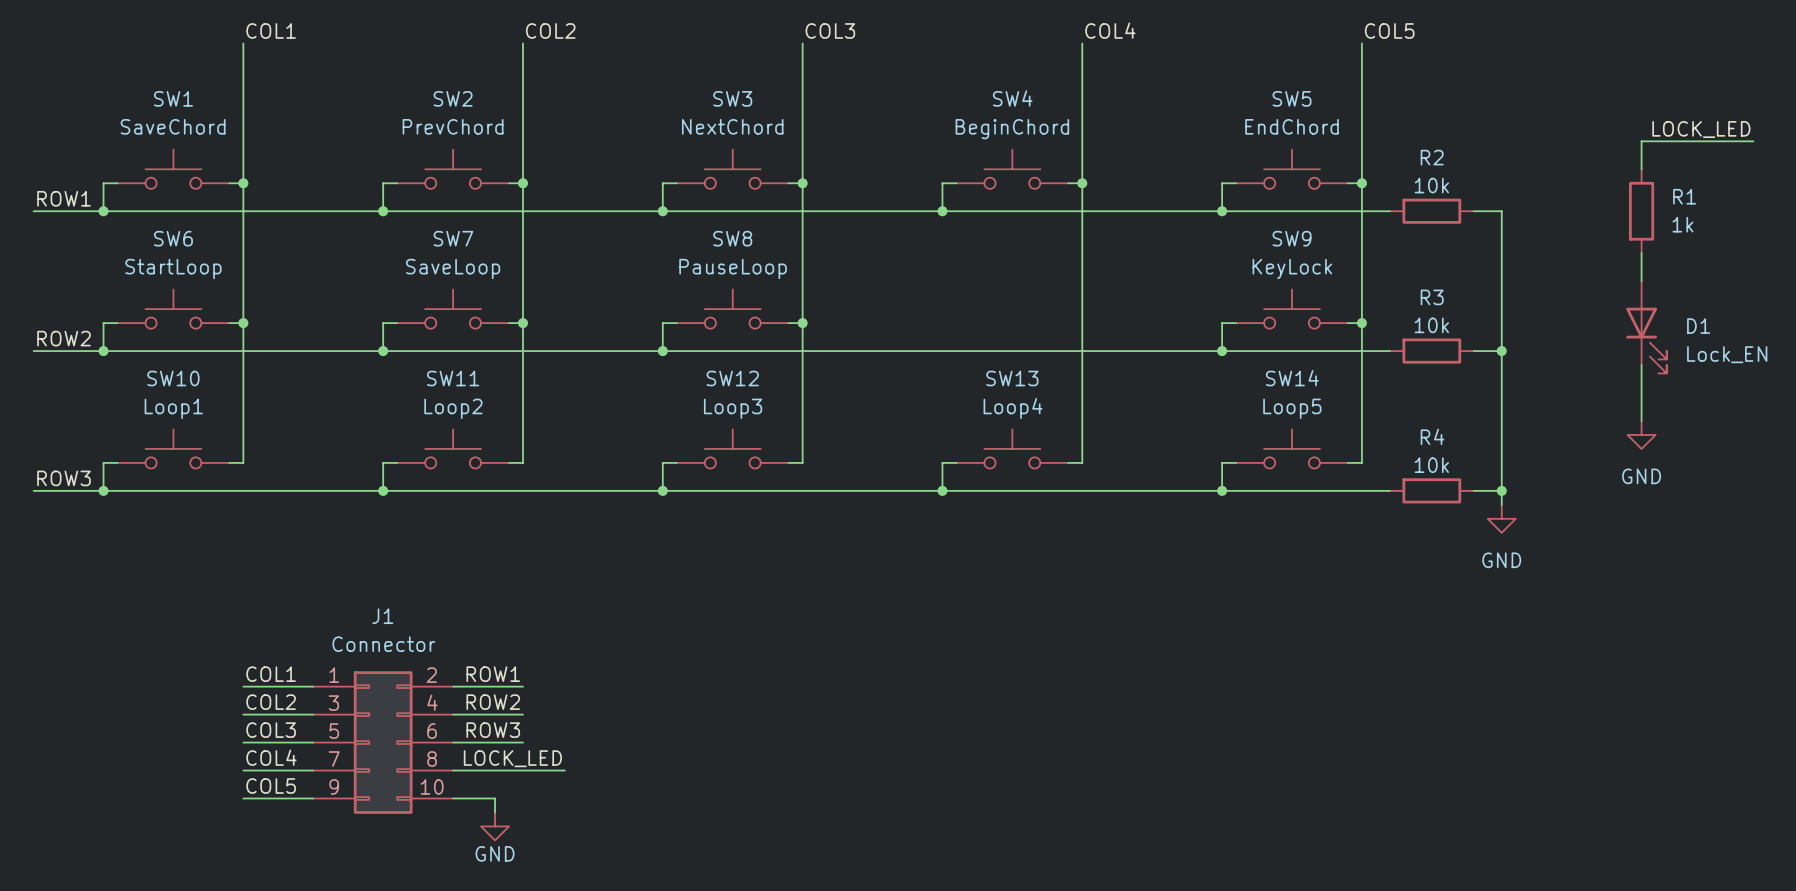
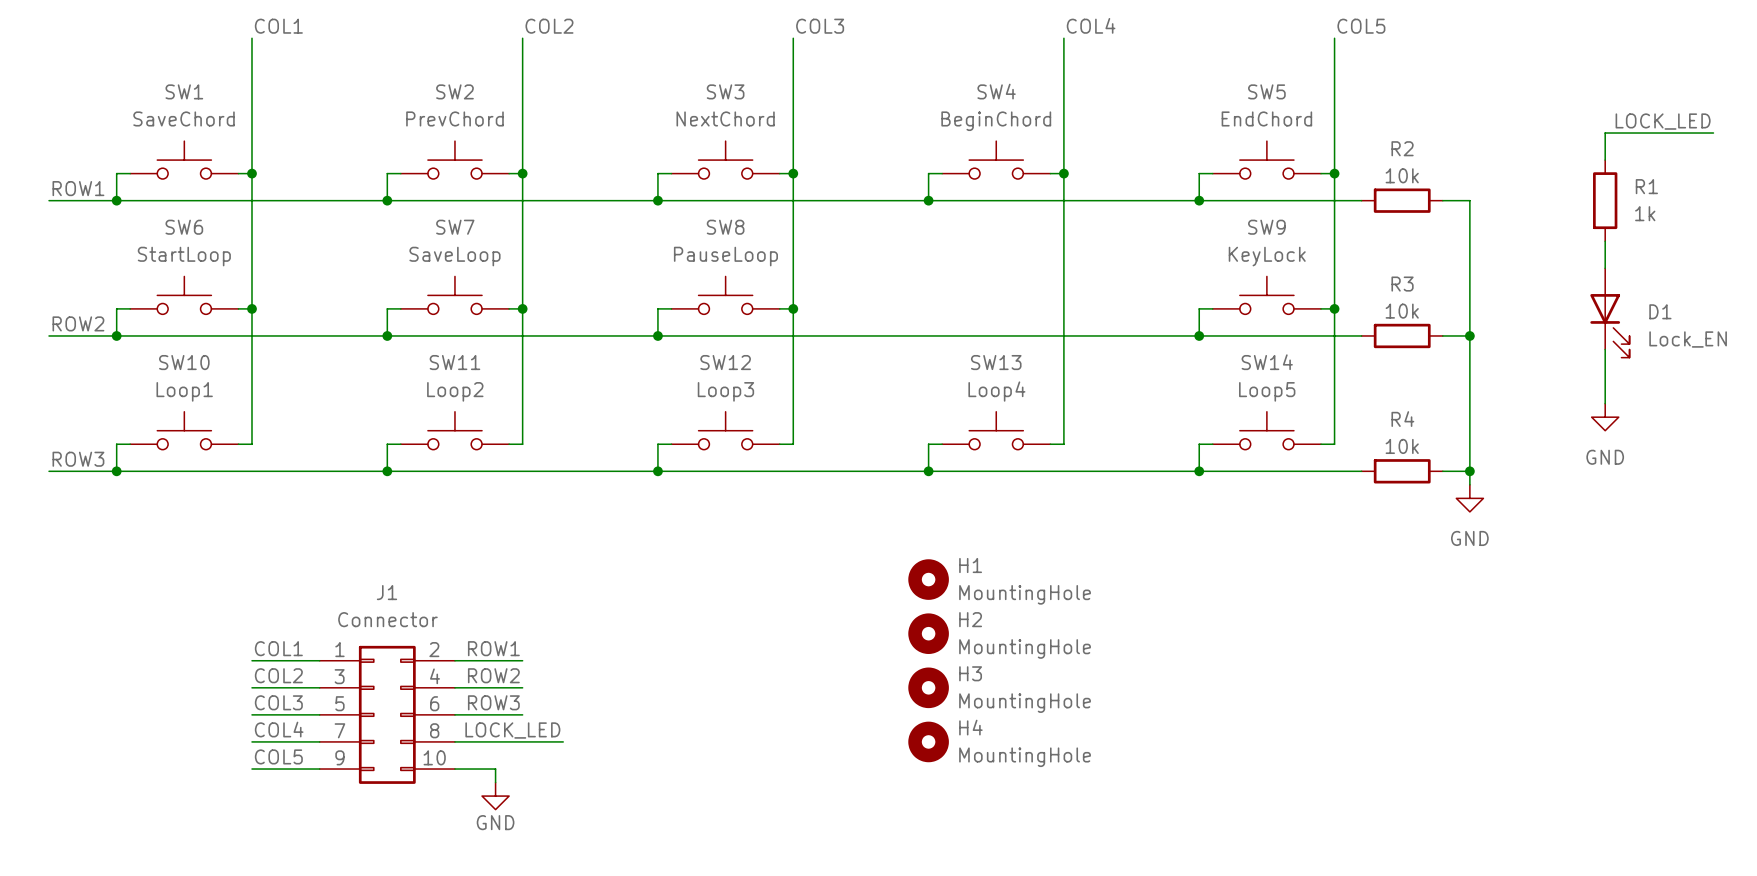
H1: none -> MountingHole (928, 579)
H2: none -> MountingHole (928, 633)
H3: none -> MountingHole (928, 687)
H4: none -> MountingHole (928, 741)

